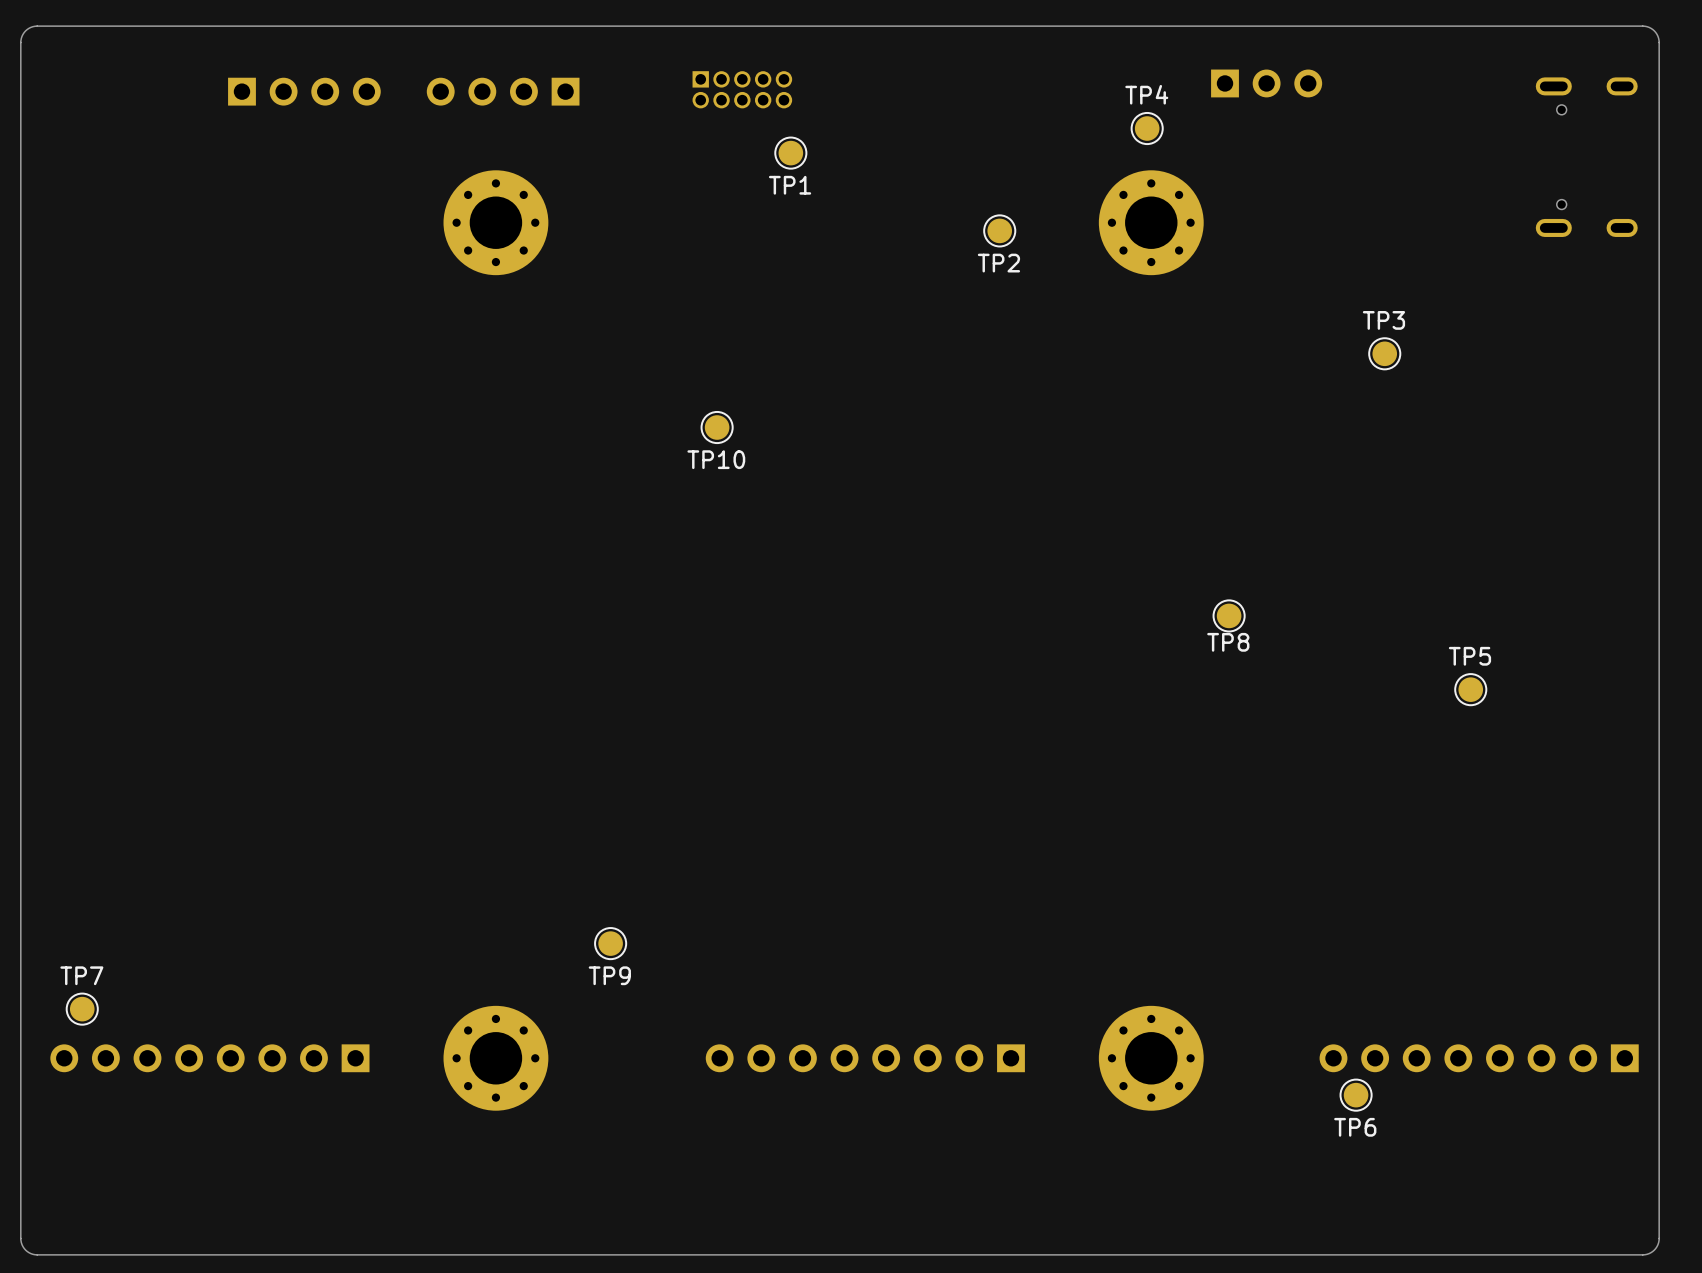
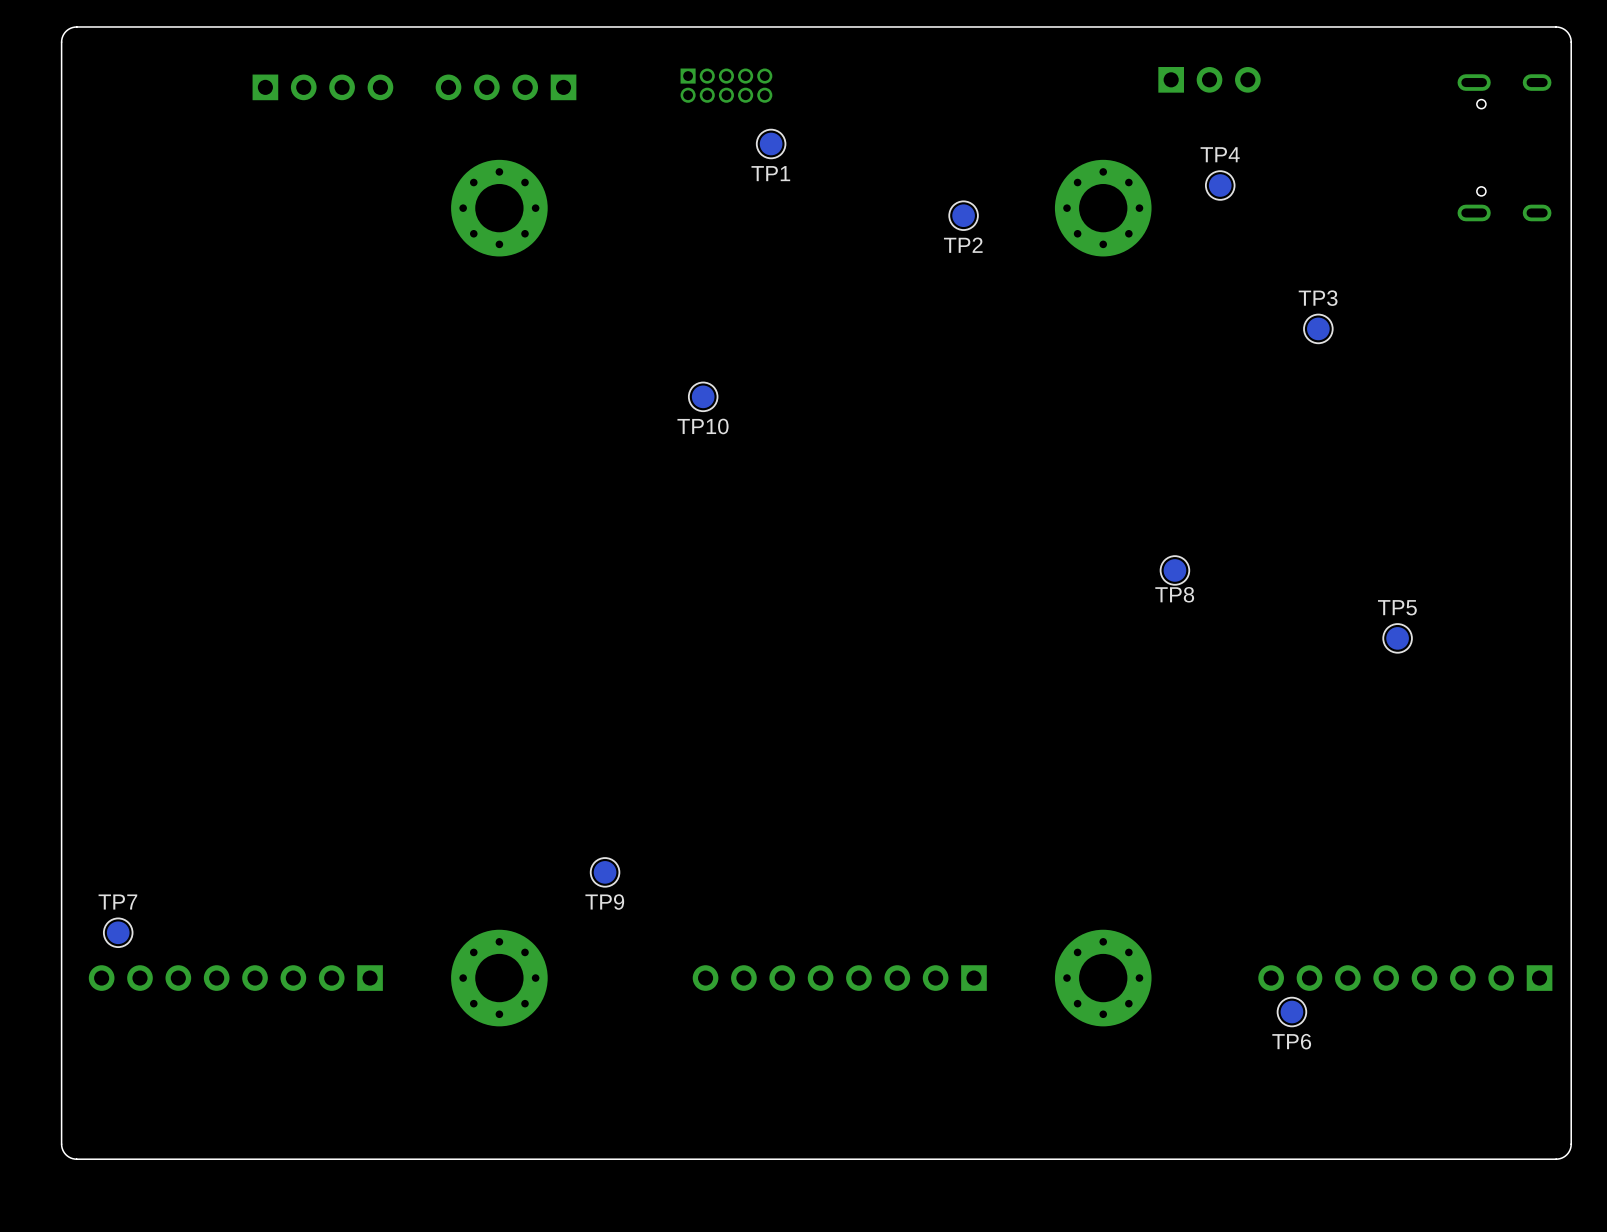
TP4 position: (1147, 128) -> (1220, 185)

